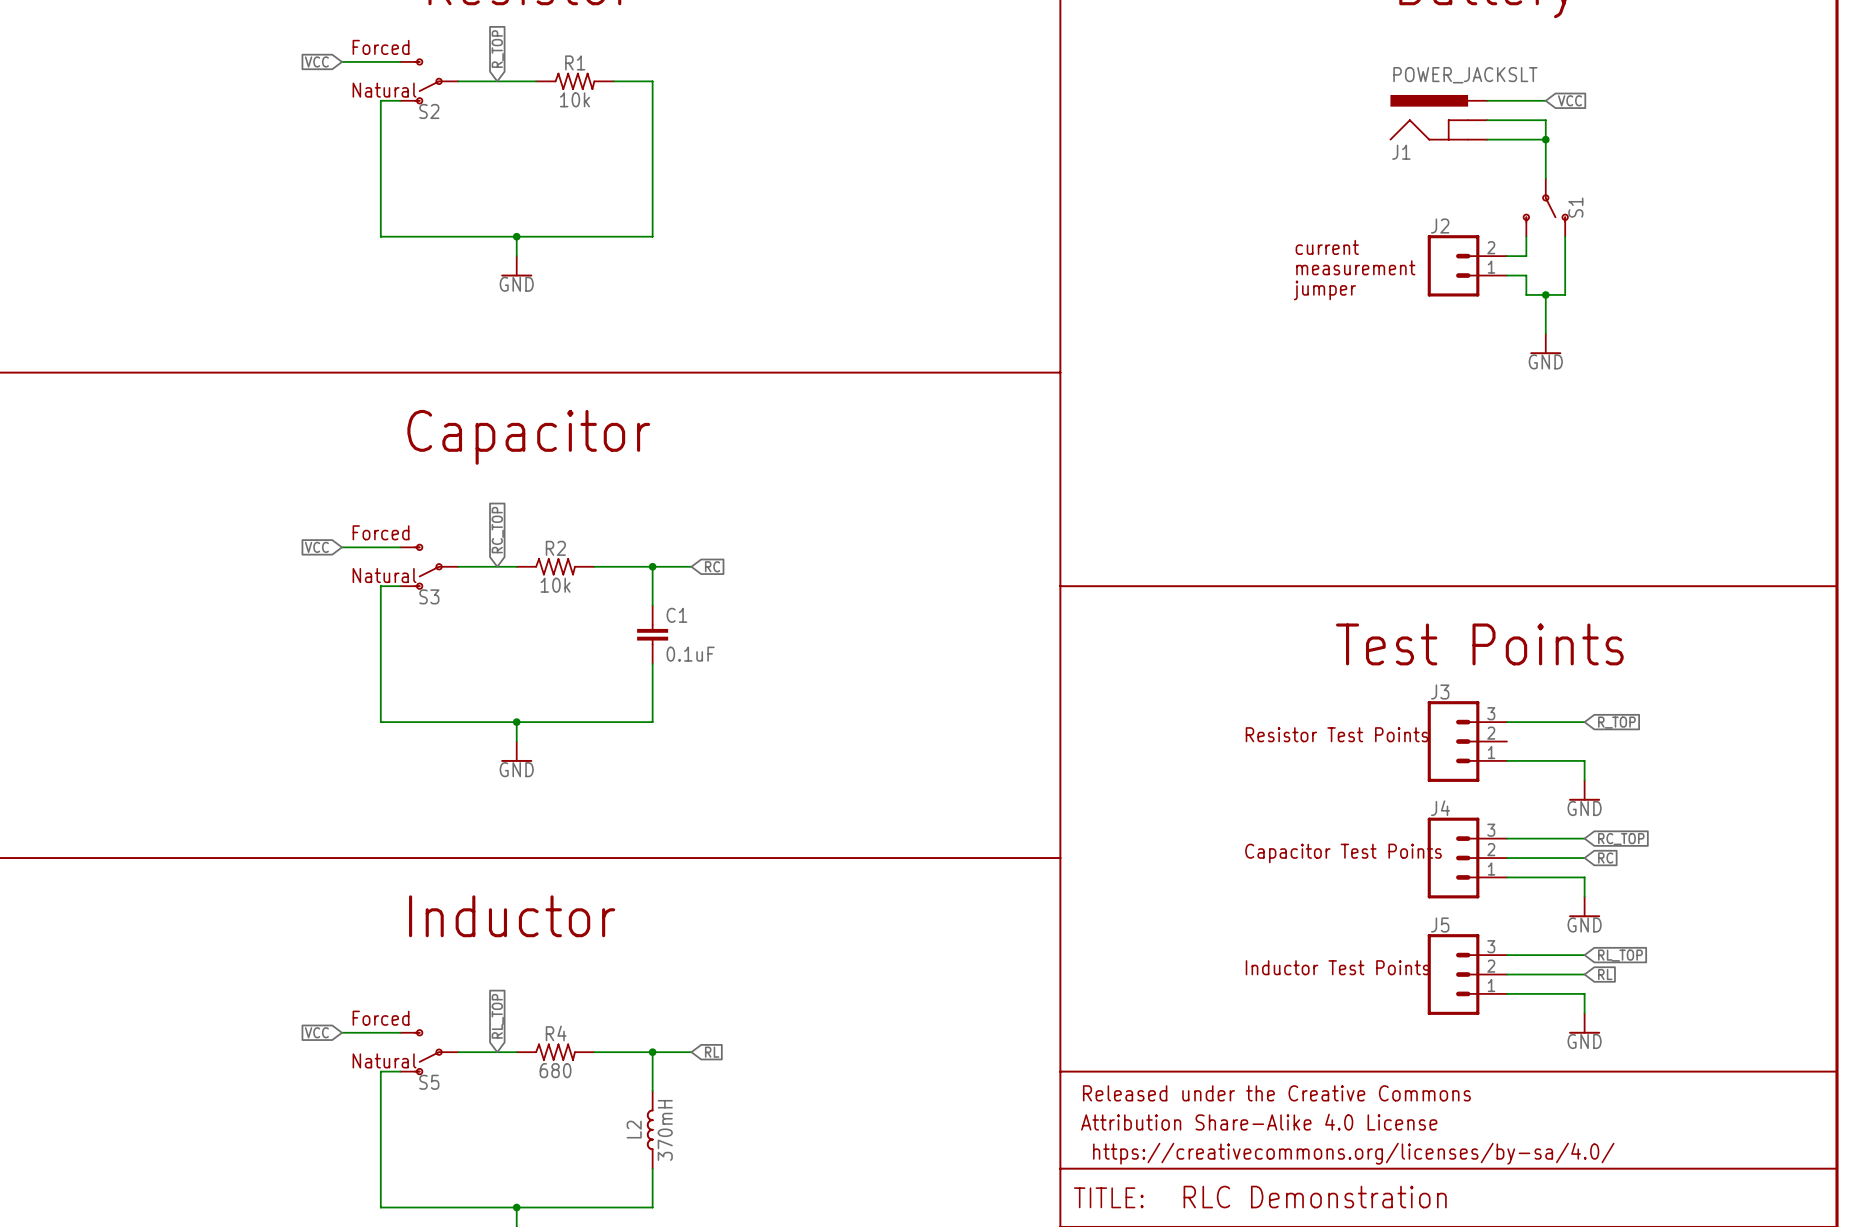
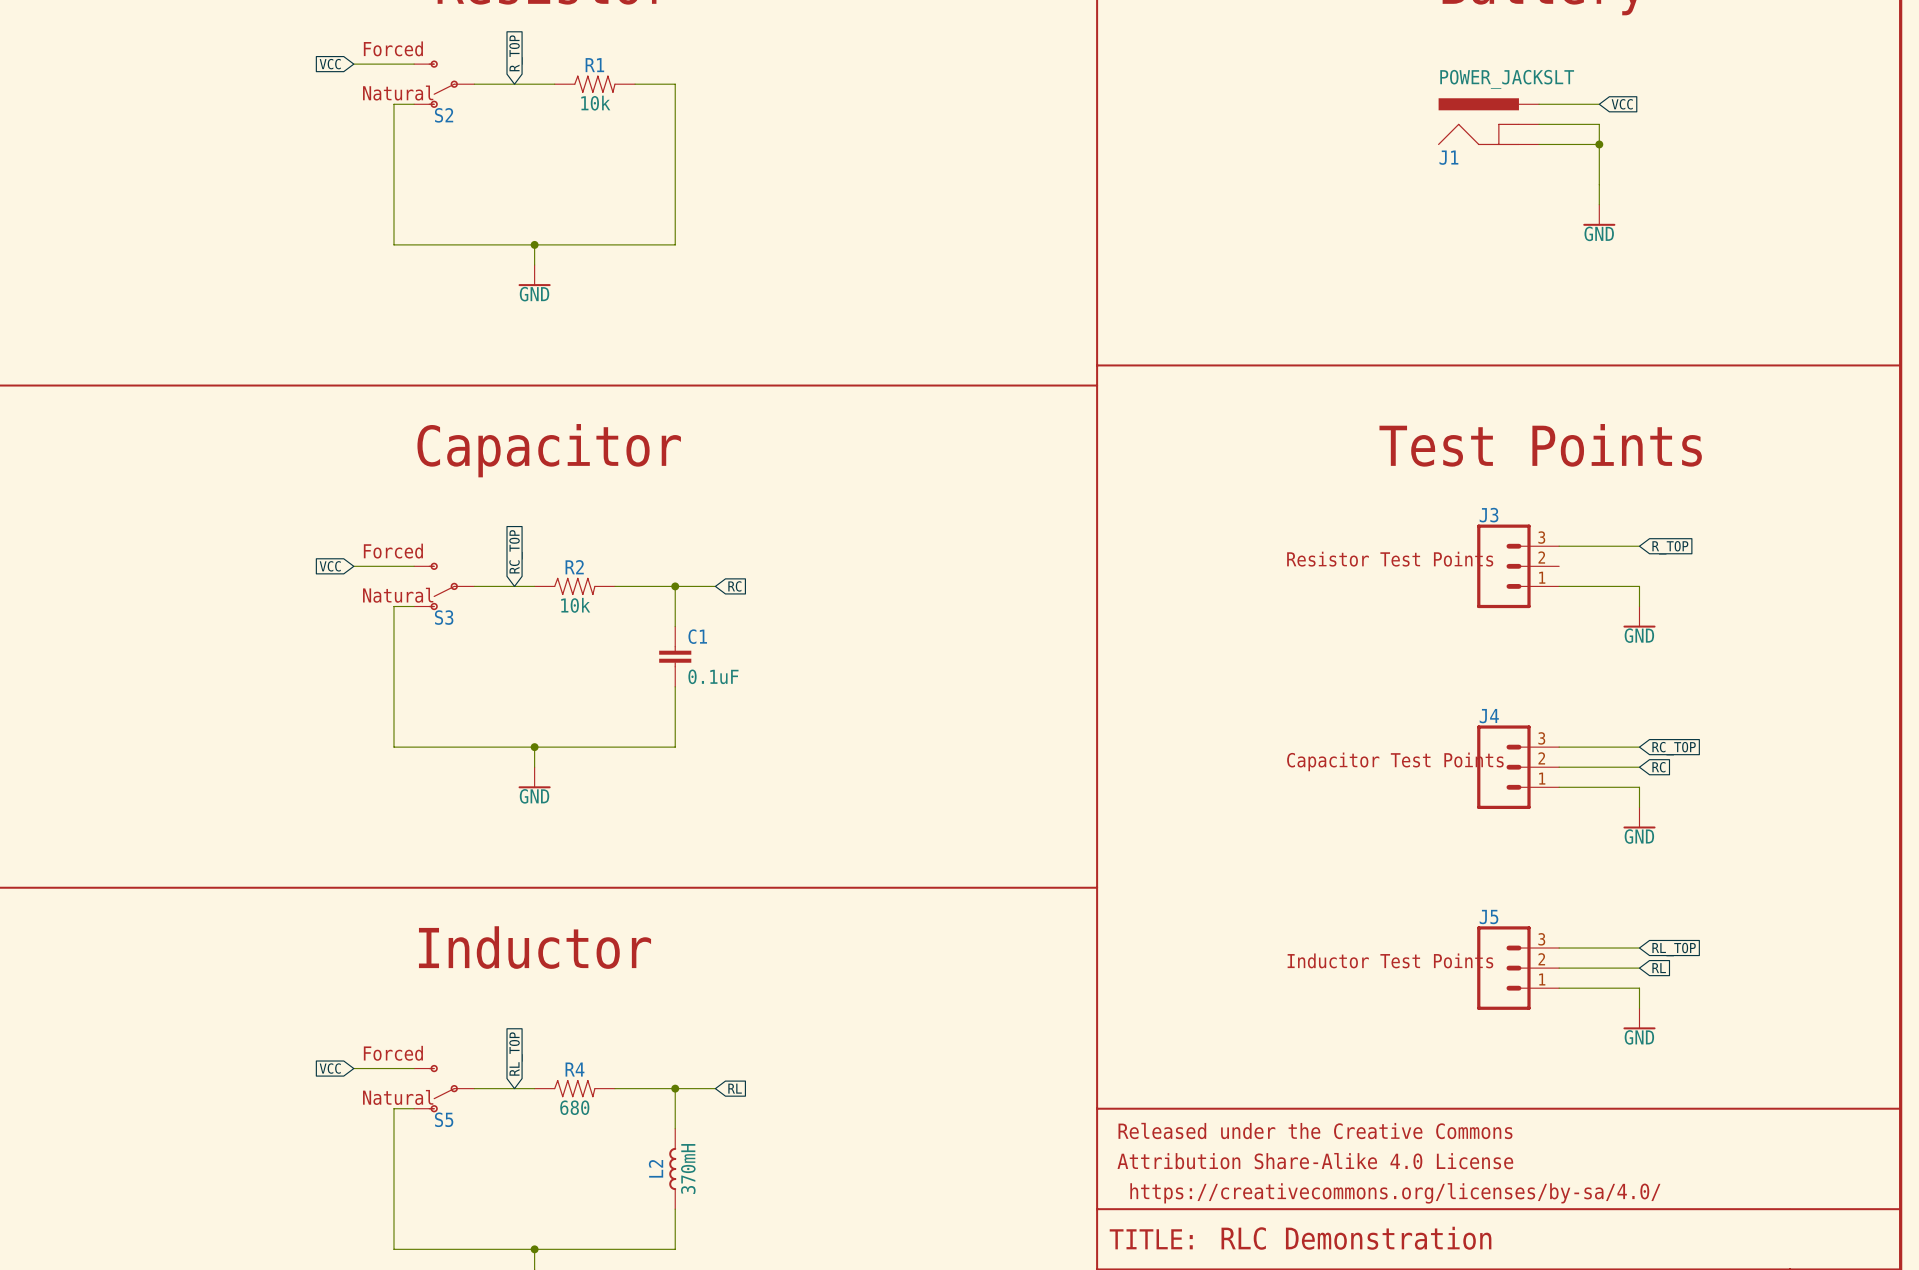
S1: (1545, 207) -> none
power symbol: none -> GND (1599, 215)
wire: (1526, 236) (1526, 256) (1506, 256) -> none
wire: (1565, 236) (1565, 294) (1526, 294) (1526, 275) (1506, 275) -> none
text: current (1327, 247) -> none
J2: (1467, 265) -> none
text: measurement (1355, 267) -> none
text: jumper (1324, 290) -> none
wire: (1545, 294) (1545, 333) -> none
junction: (1545, 294) -> none
power symbol: GND (1545, 343) -> none
line: none -> (1097, 365) (1900, 365)
text: none -> Test Points (1540, 445)
wire: none -> (1559, 546) (1639, 546)
global label: none -> R_TOP (1670, 547)
text: none -> Resistor Test Points (1390, 559)
J3: none -> (1518, 566)
wire: none -> (1559, 586) (1639, 586) (1639, 606)
line: (1060, 586) (1837, 586) -> none
power symbol: none -> GND (1639, 617)
text: Test Points (1479, 644) -> none
J3 name: J3 (1440, 692) -> J4 (1489, 716)
global label: R_TOP (1616, 722) -> RC_TOP (1674, 748)
text: Resistor Test Points (1337, 734) -> Capacitor Test Points (1395, 761)
wire: none -> (1559, 767) (1639, 767)
wire: (1506, 838) (1584, 838) -> (1559, 948) (1639, 948)
global label: RC_TOP (1621, 839) -> none
text: Capacitor Test Points (1343, 853) -> none
J4: (1467, 858) -> none
wire: (1506, 858) (1584, 858) -> (1559, 968) (1639, 968)
global label position: RC (1605, 858) -> RC (1658, 767)
wire: (1506, 877) (1584, 877) (1584, 896) -> none
power symbol: GND (1584, 907) -> none
global label position: RL_TOP (1620, 955) -> RL_TOP (1674, 949)
text position: Inductor Test Points (1337, 967) -> Inductor Test Points (1390, 960)
J5 position: (1467, 974) -> (1518, 968)
wire: (1506, 974) (1584, 974) -> (1639, 988) (1639, 1008)
global label position: RL (1605, 974) -> RL (1659, 968)
power symbol: none -> GND (1639, 1018)
wire: (1506, 993) (1584, 993) (1584, 1013) -> none
power symbol: GND (1584, 1023) -> none

